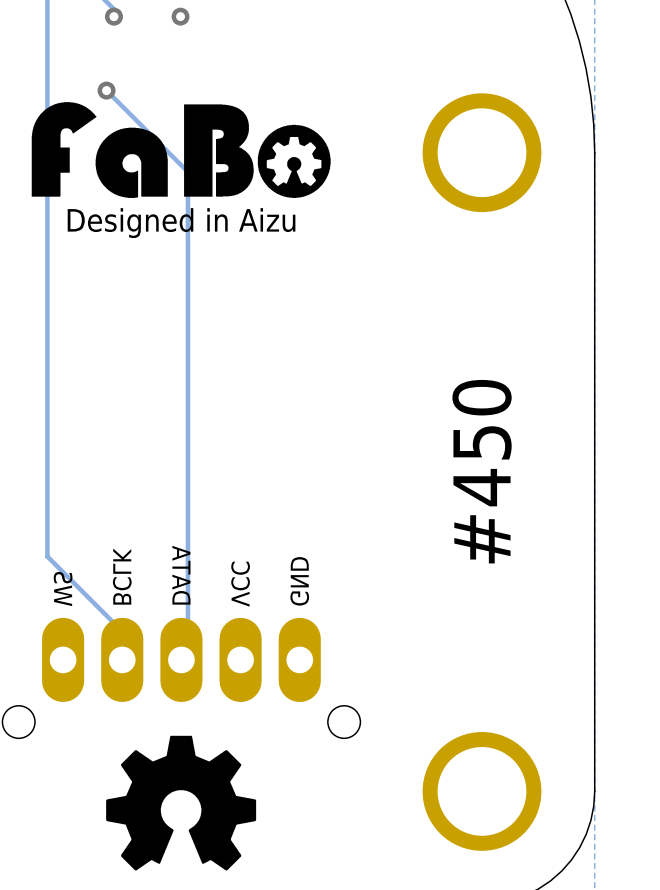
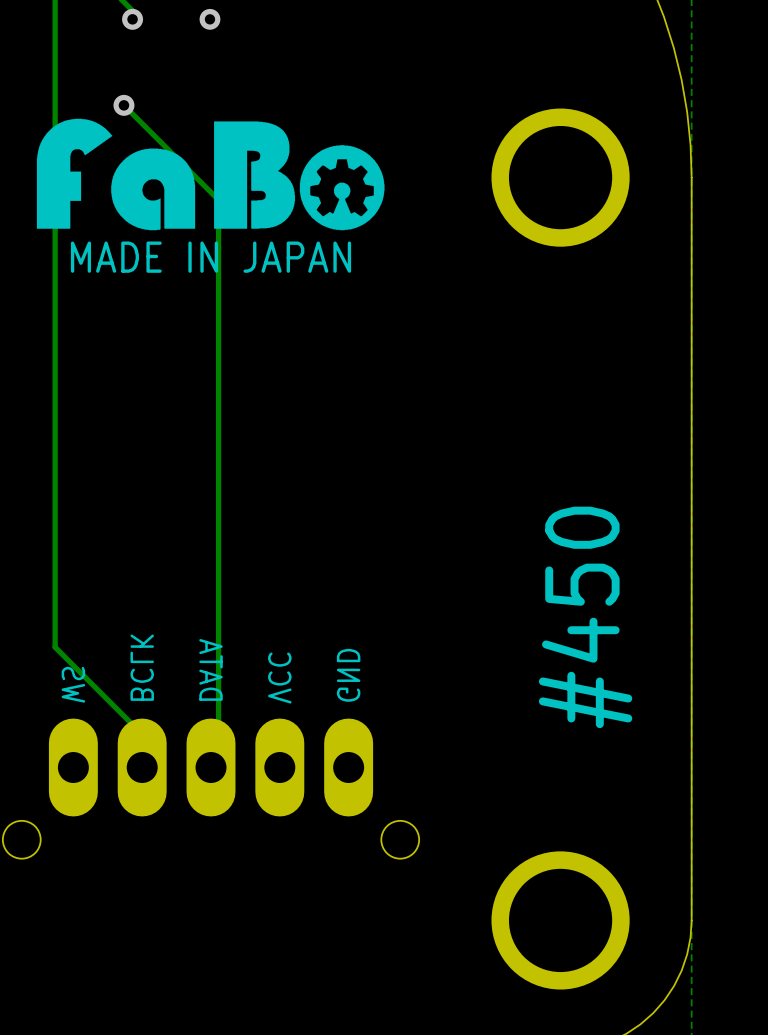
text: Designed in Aizu (181, 223) -> MADE IN JAPAN (211, 257)
text position: #450 (482, 471) -> #450 (585, 617)
drawing: [106, 735, 257, 871] -> none

